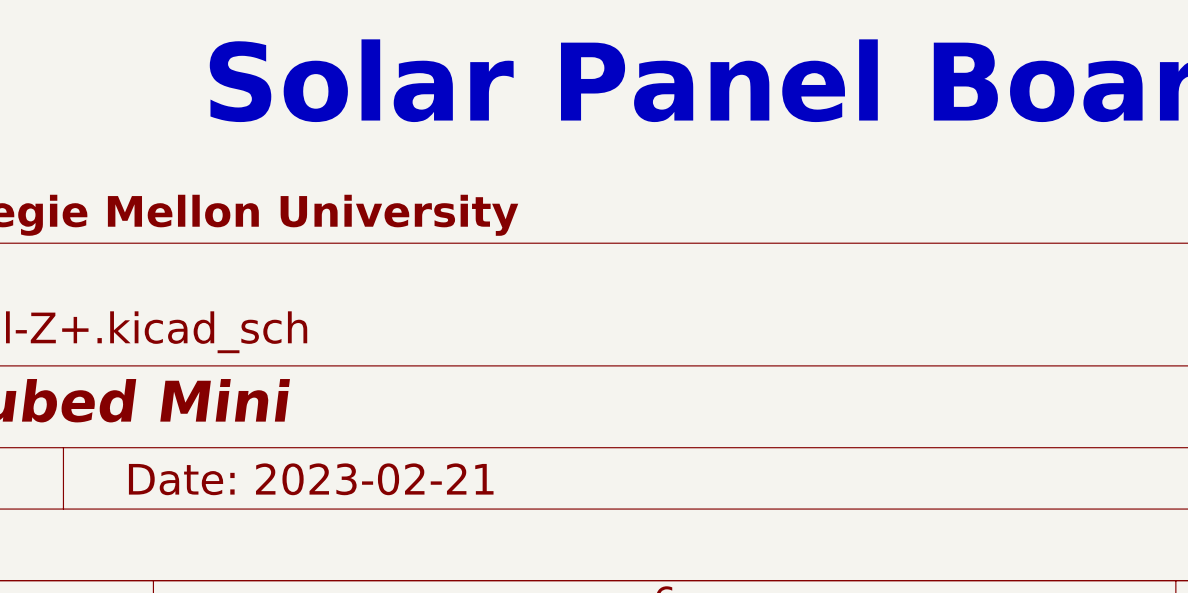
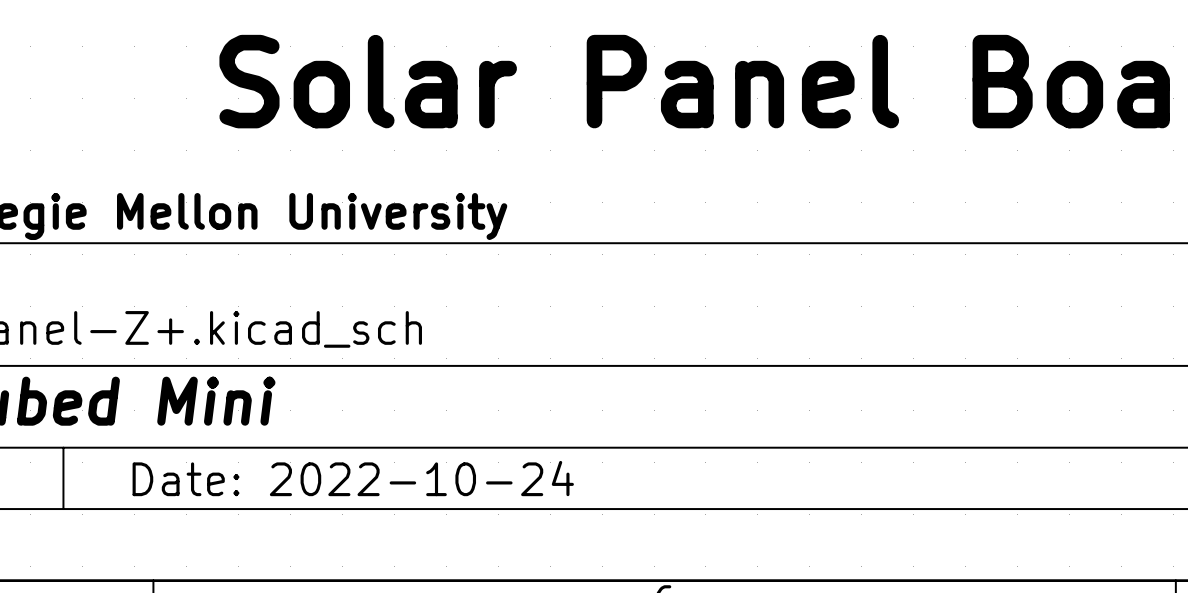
title block: Date: 2023-02-21 (311, 479) -> Date: 2022-10-24 (353, 478)

